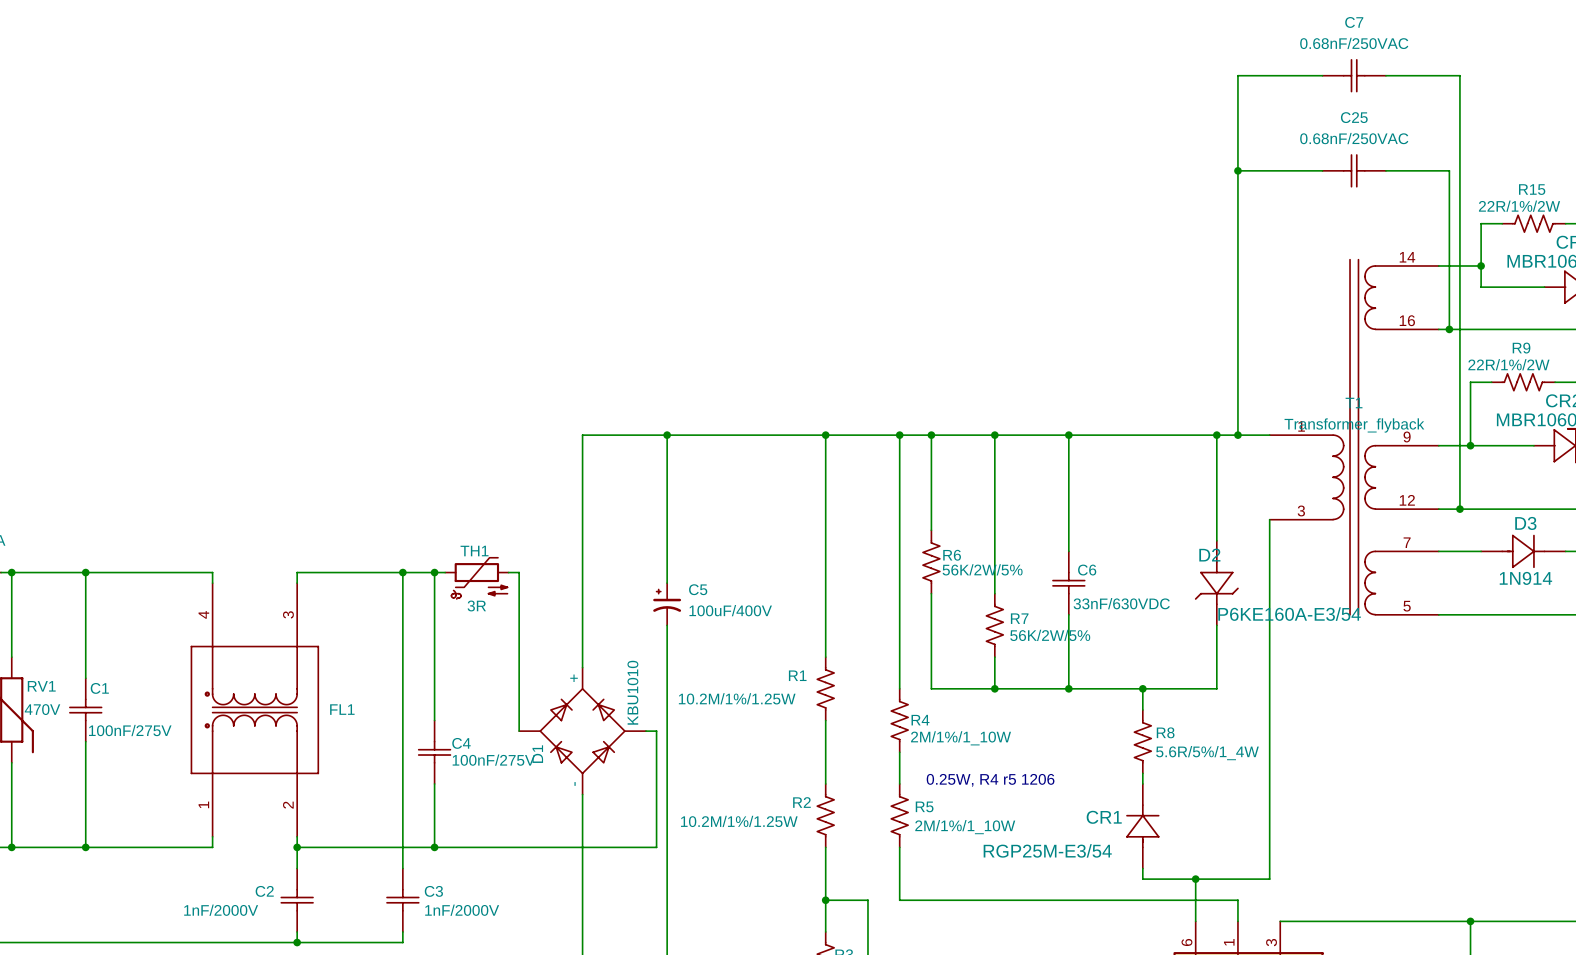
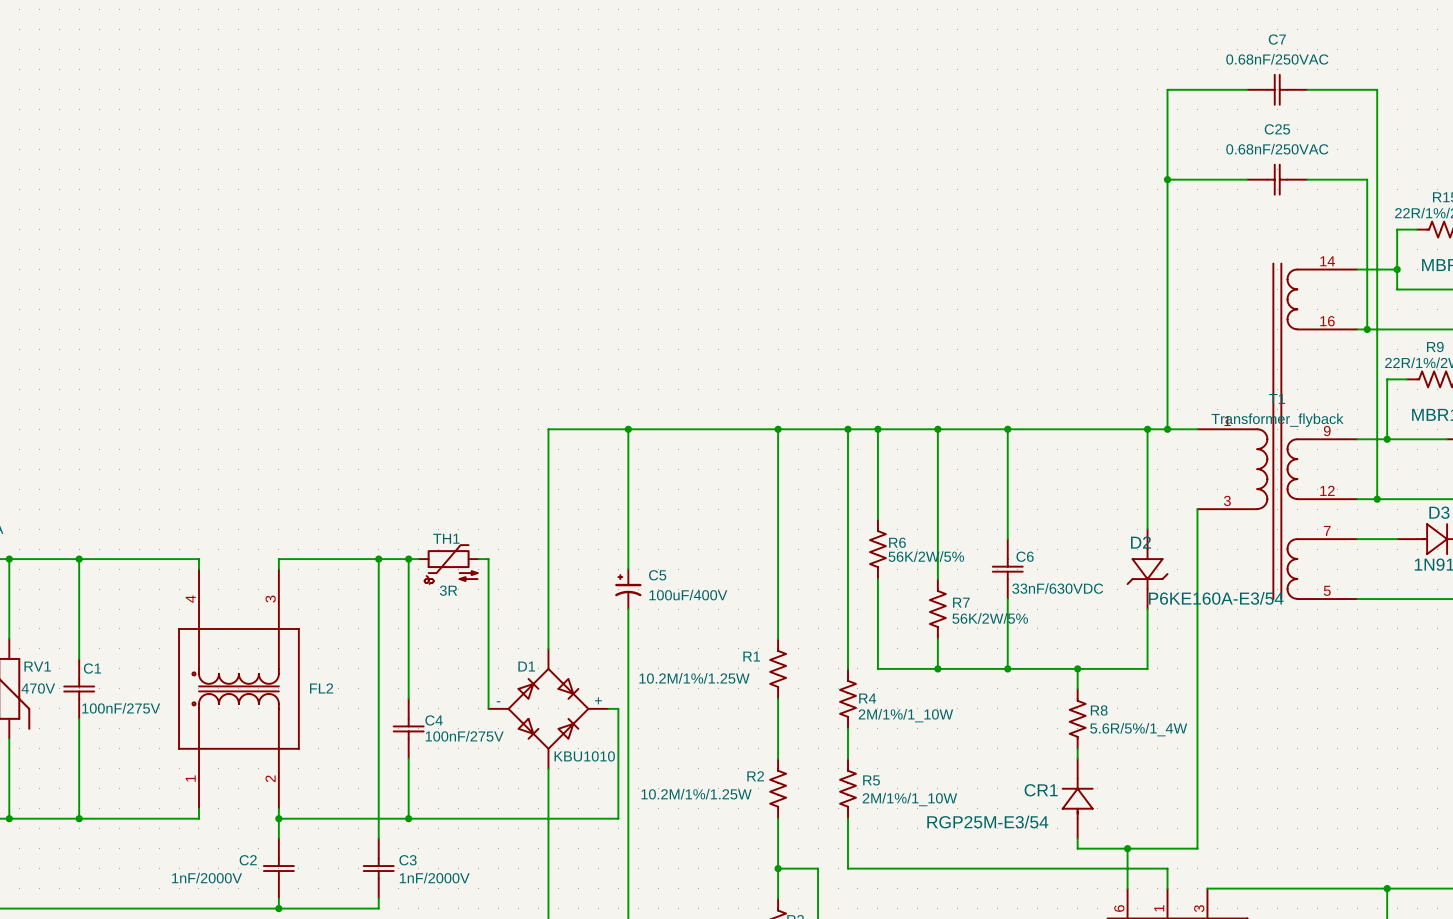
FL1 name: FL1 (342, 709) -> FL2 (321, 688)
D1 rotation: 0° (582, 731) -> 90° clockwise (548, 708)
text: 0.25W, R4 r5 1206 (990, 780) -> none

